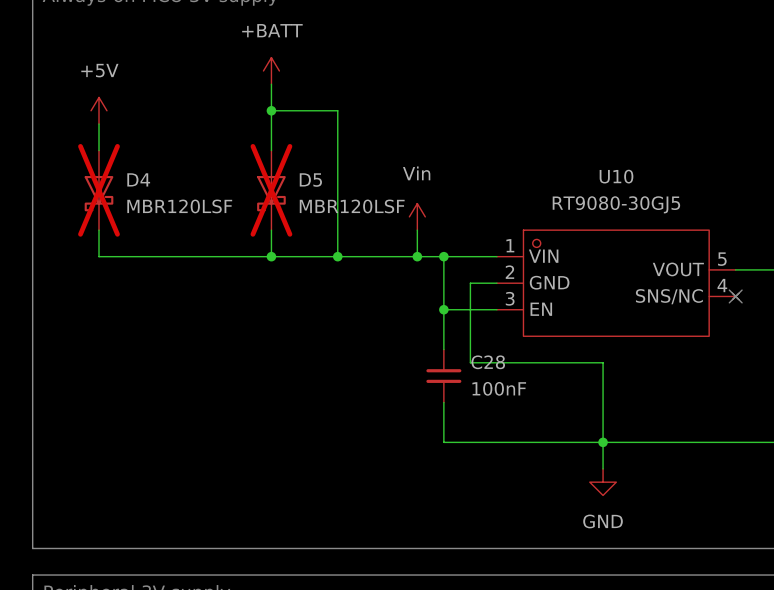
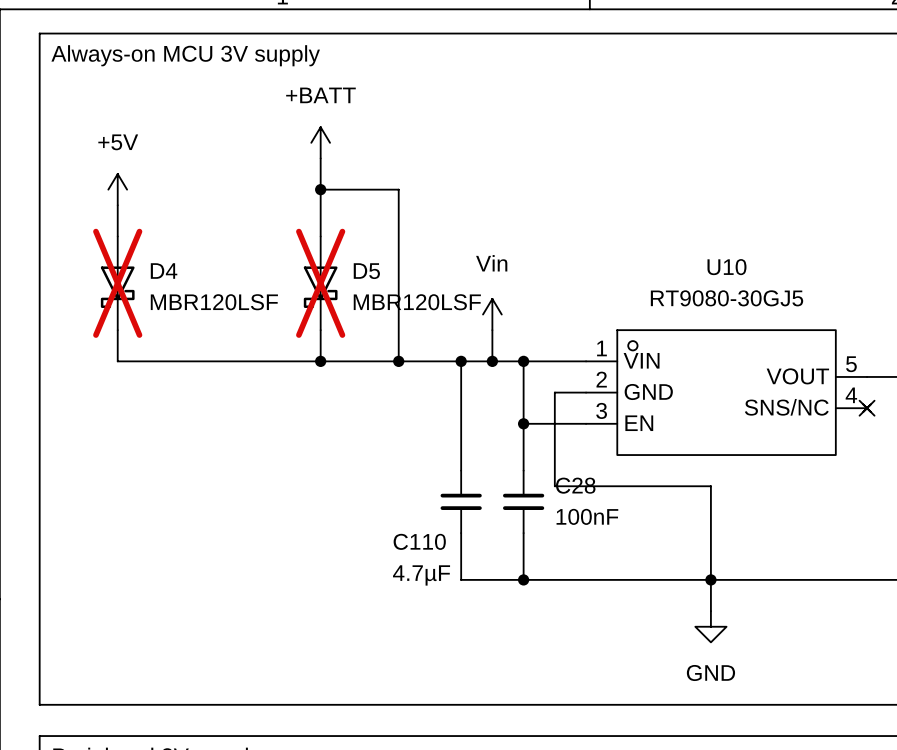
wire: none -> (461, 361) (461, 470)
junction: none -> (461, 361)
C110: none -> 4.7µF (461, 501)
wire: none -> (461, 533) (461, 579) (523, 579)
junction: none -> (523, 579)

